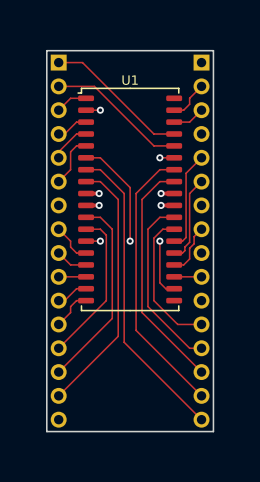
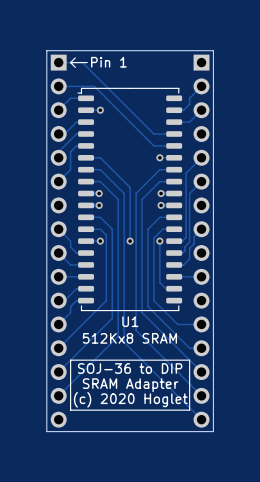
line: none -> (75, 57) (70, 62)
line: none -> (70, 62) (75, 67)
line: none -> (70, 62) (87, 62)
text: none -> Pin 1 (108, 62)
U1 name position: U1 (130, 80) -> U1 (130, 321)
text: none -> 512Kx8 SRAM (129, 338)
line: none -> (70, 360) (70, 410) (189, 410) (189, 360) (70, 360)
text: none -> SOJ-36 to DIP (130, 368)
text: none -> SRAM Adapter (130, 385)
text: none -> (c) 2020 Hoglet (130, 399)

